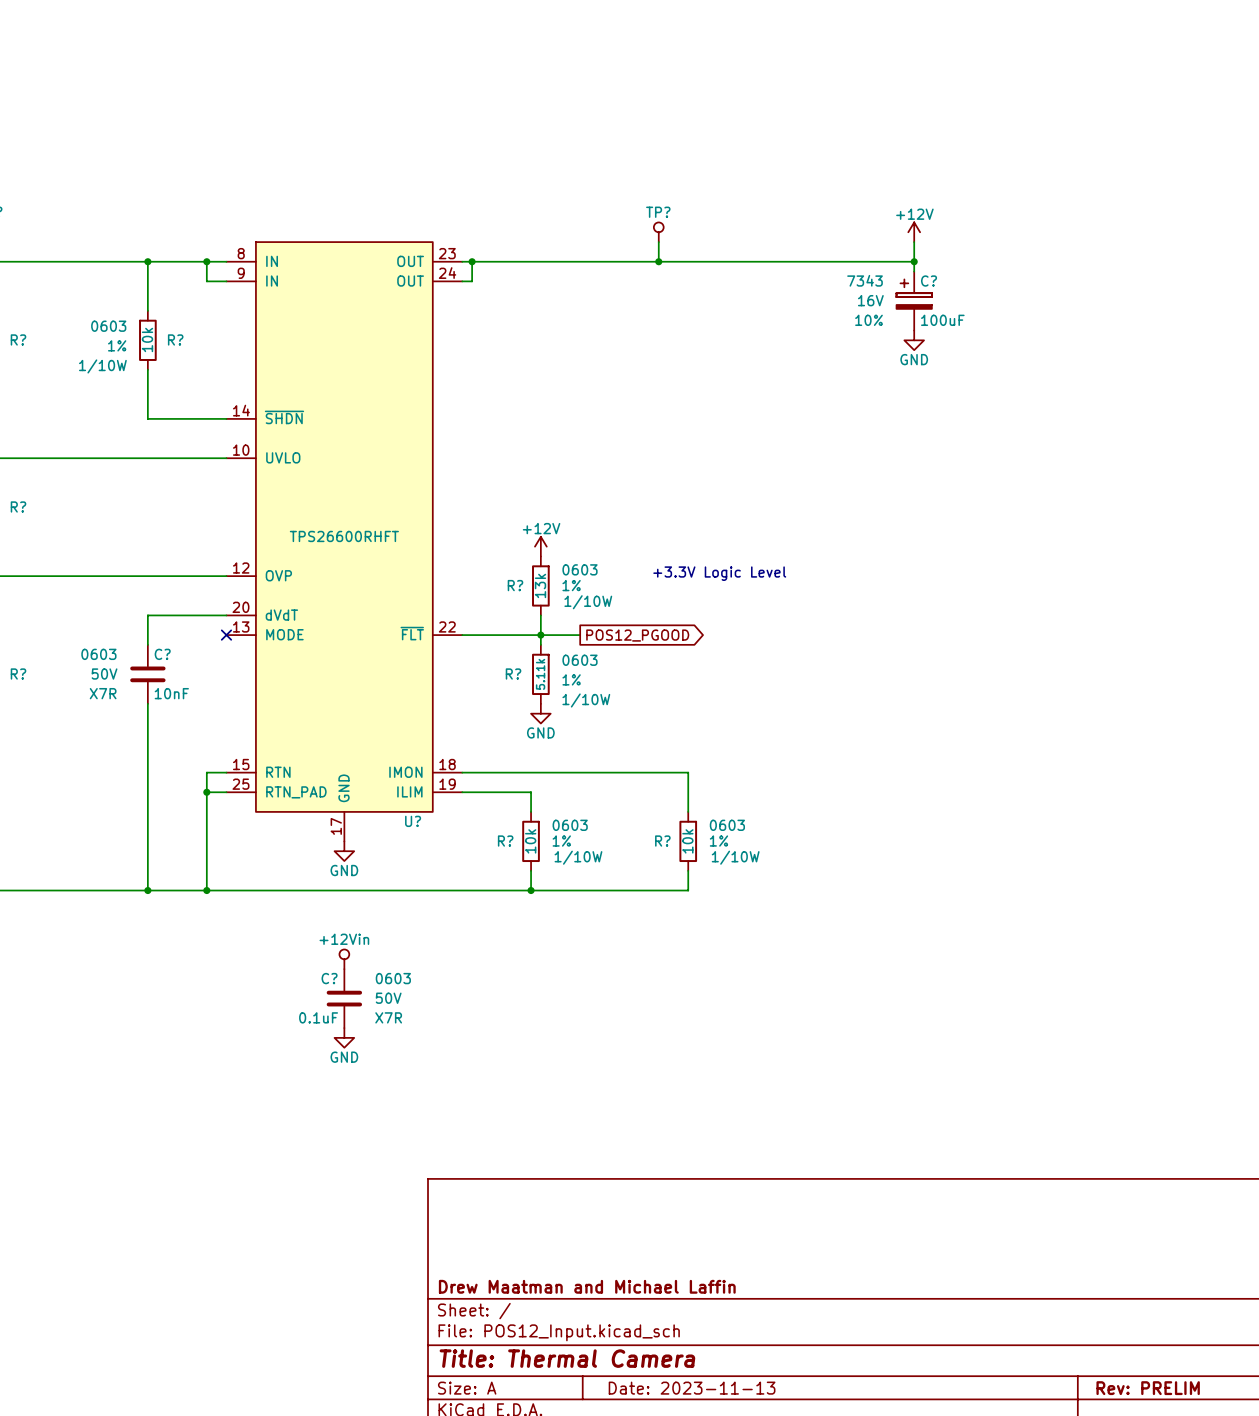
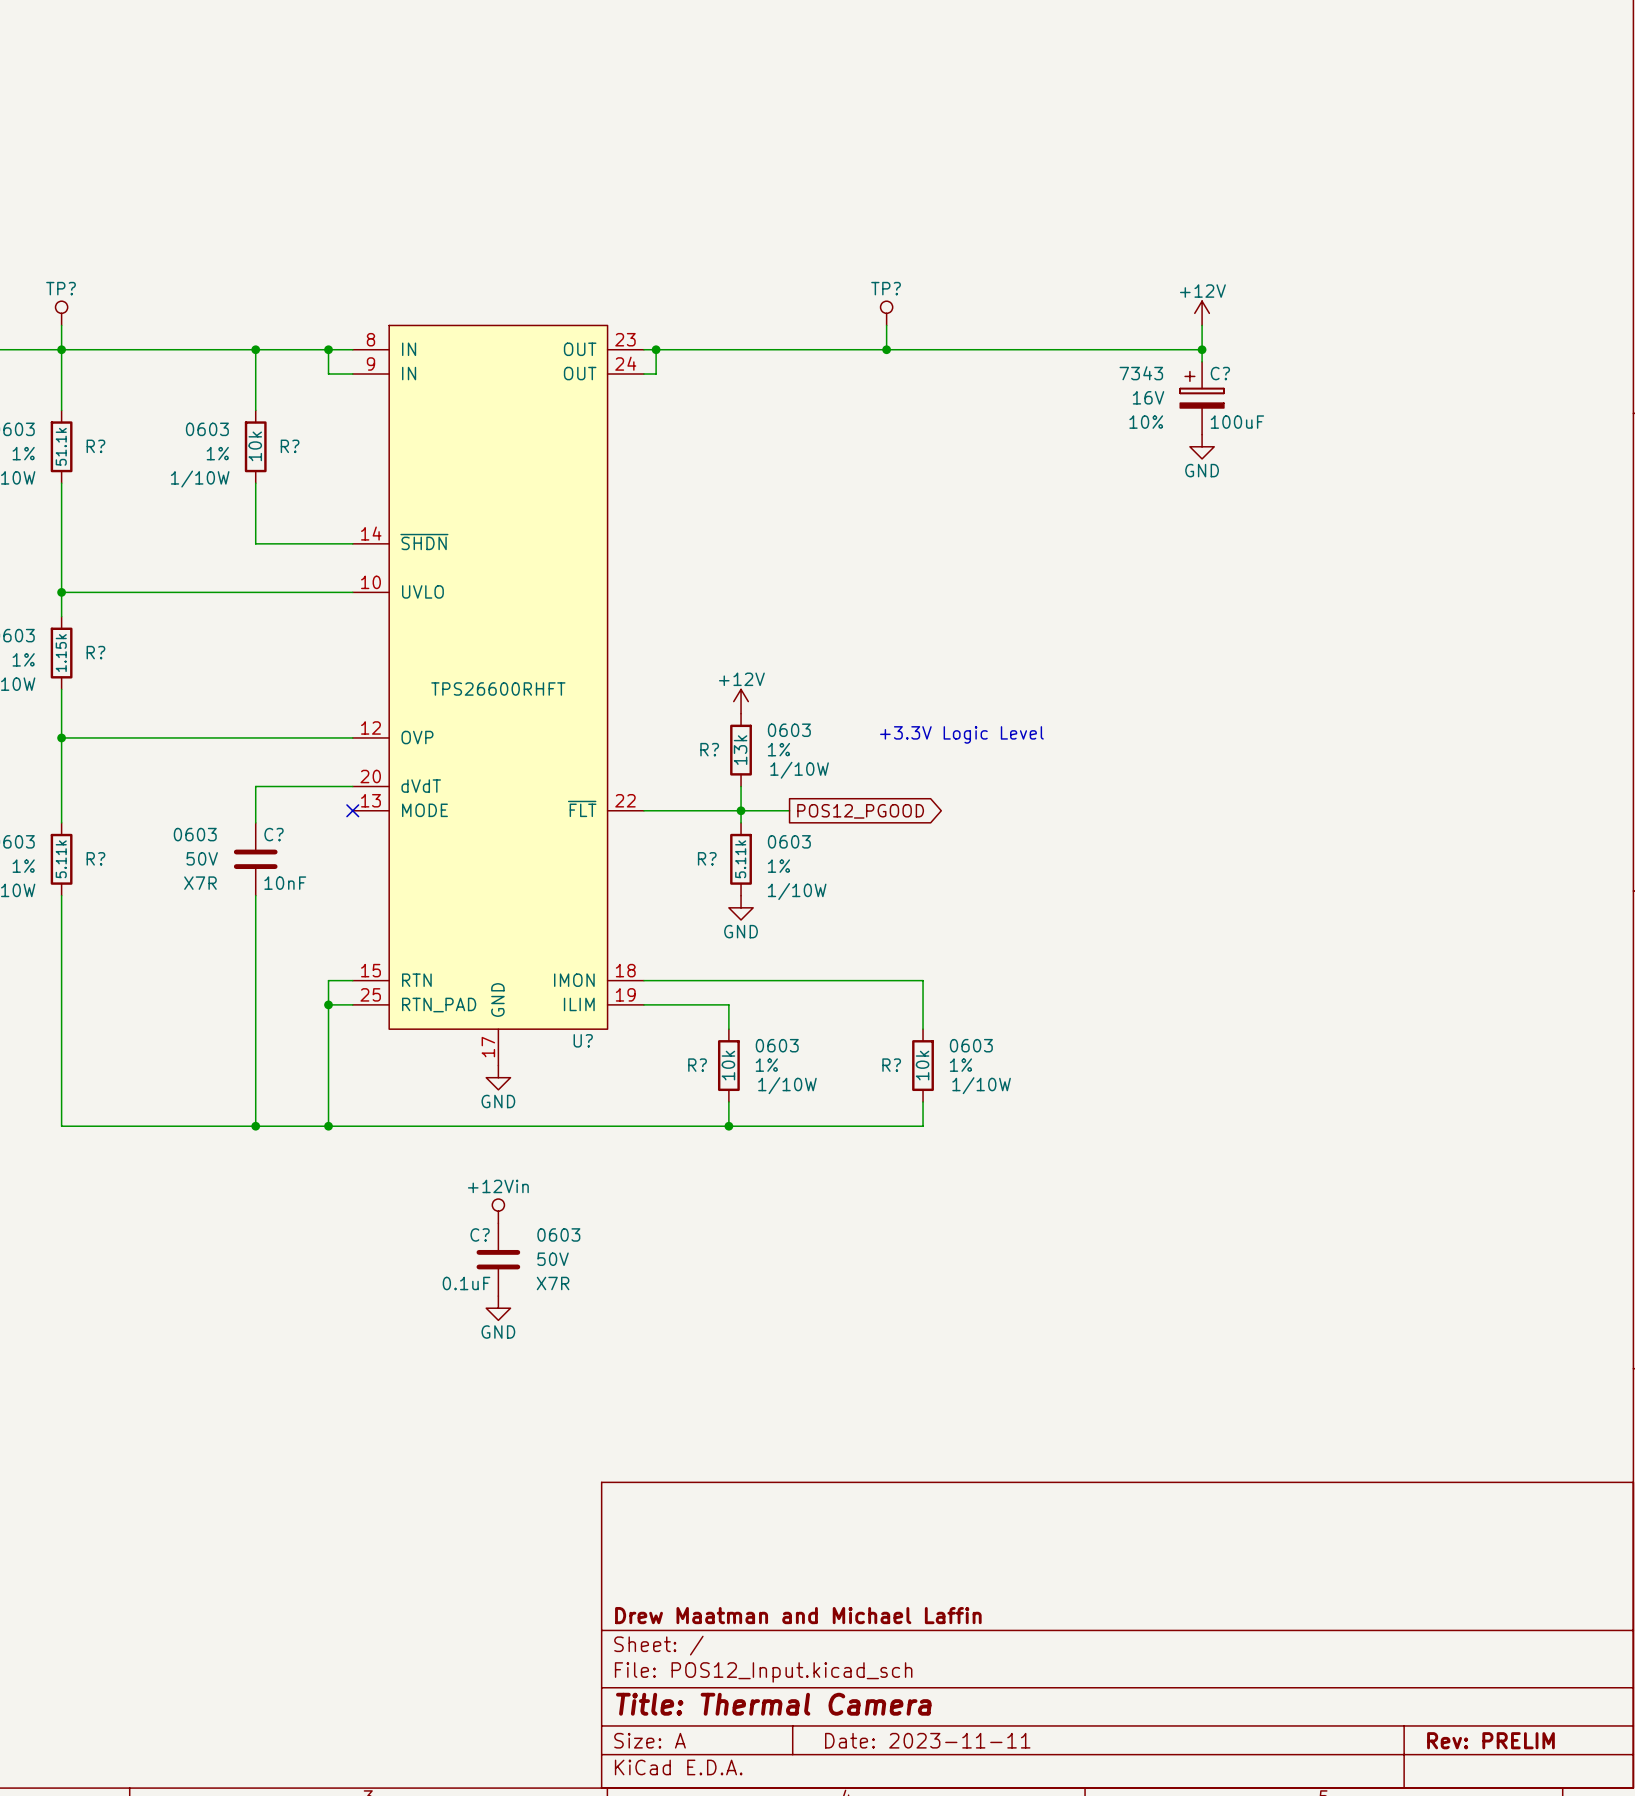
title block: Date: 2023-11-13 (692, 1388) -> Date: 2023-11-11 (927, 1740)

